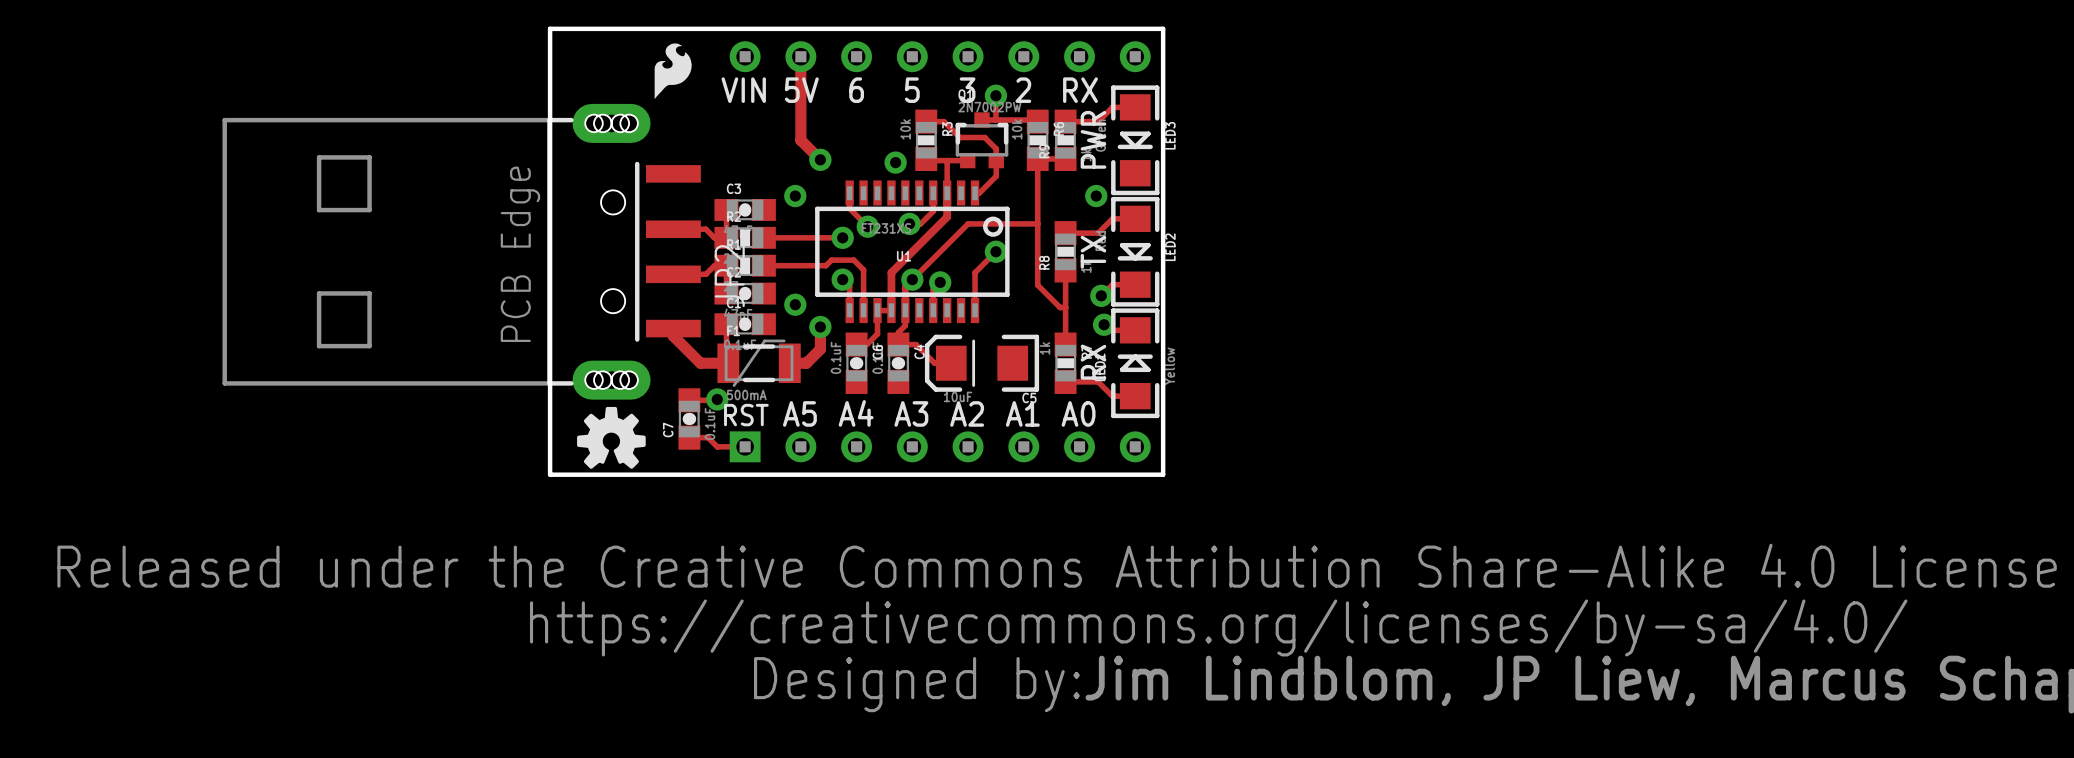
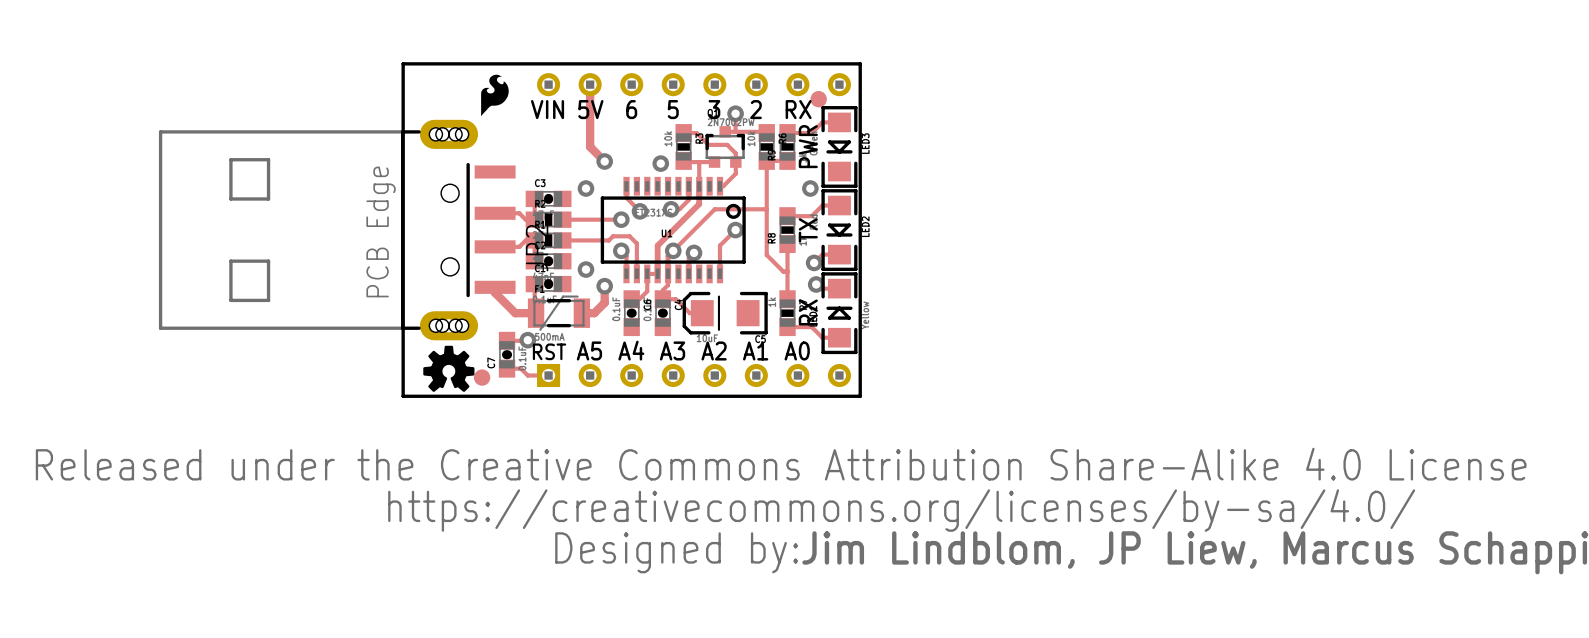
part: none -> (818, 99)
part: none -> (482, 377)

